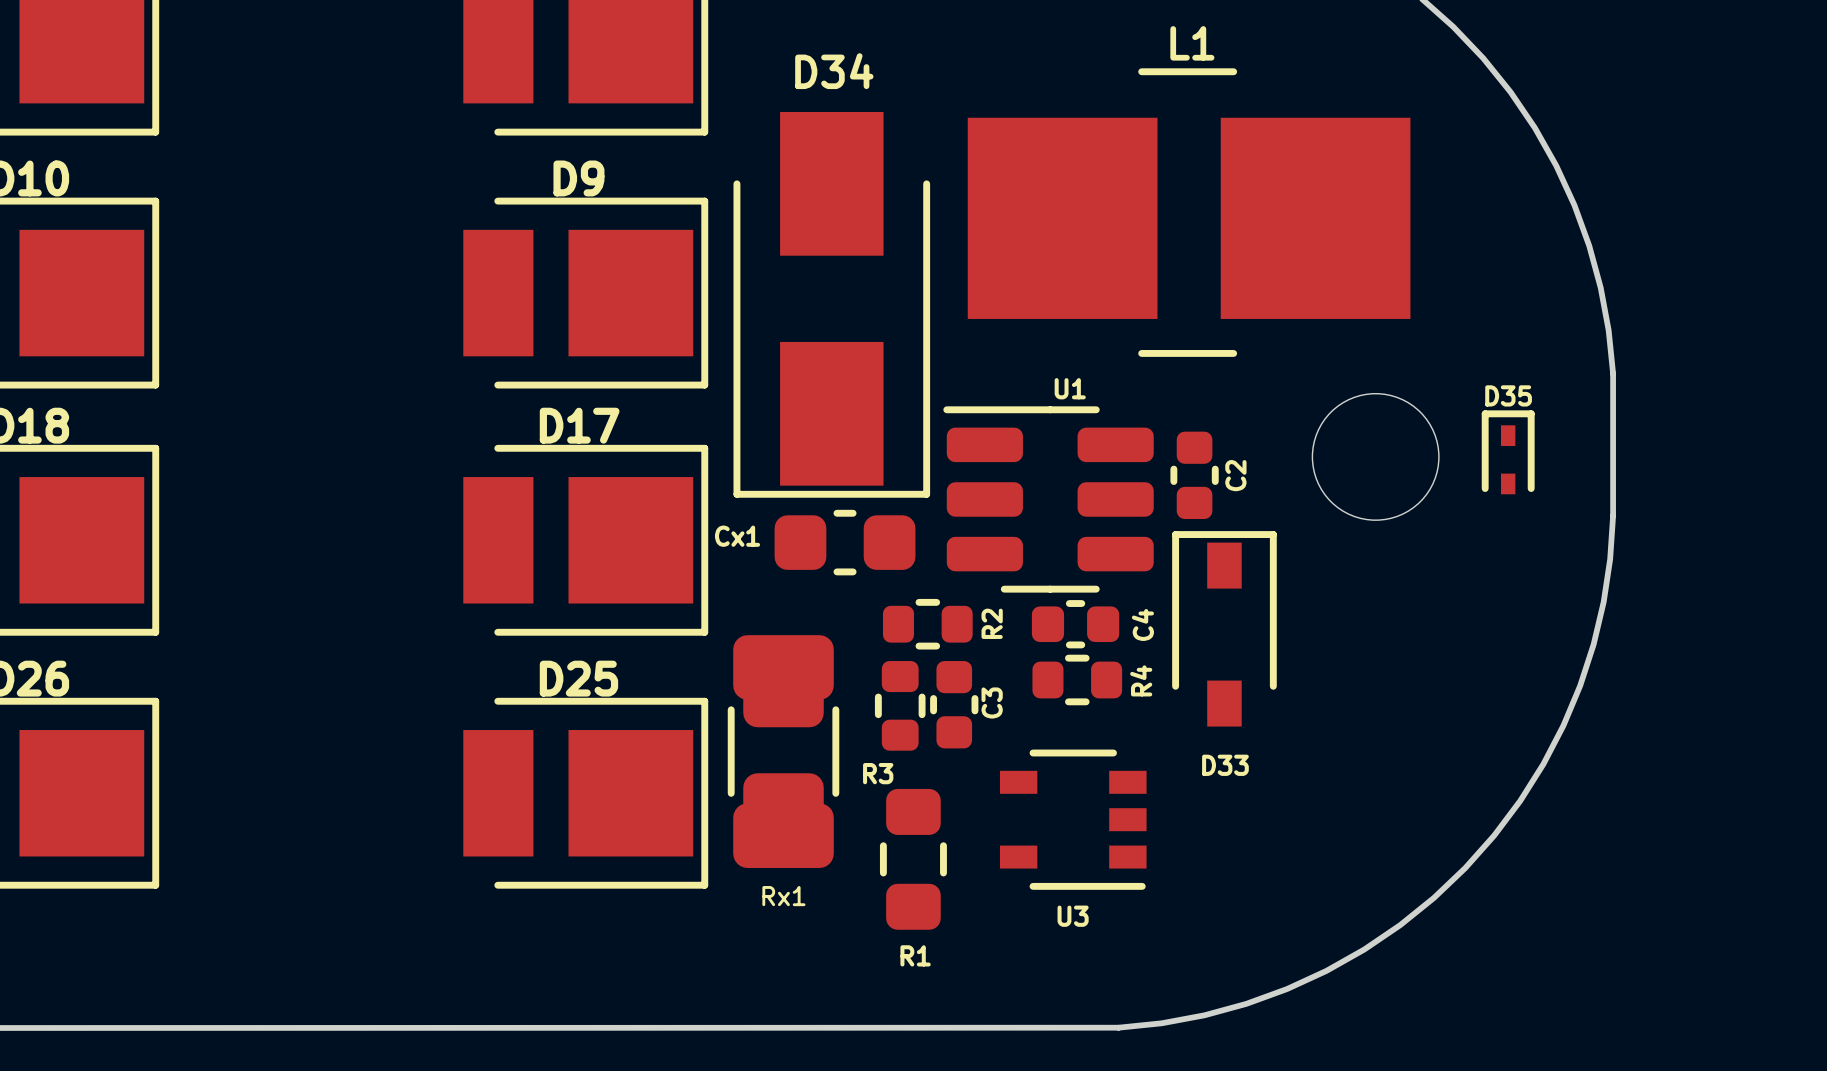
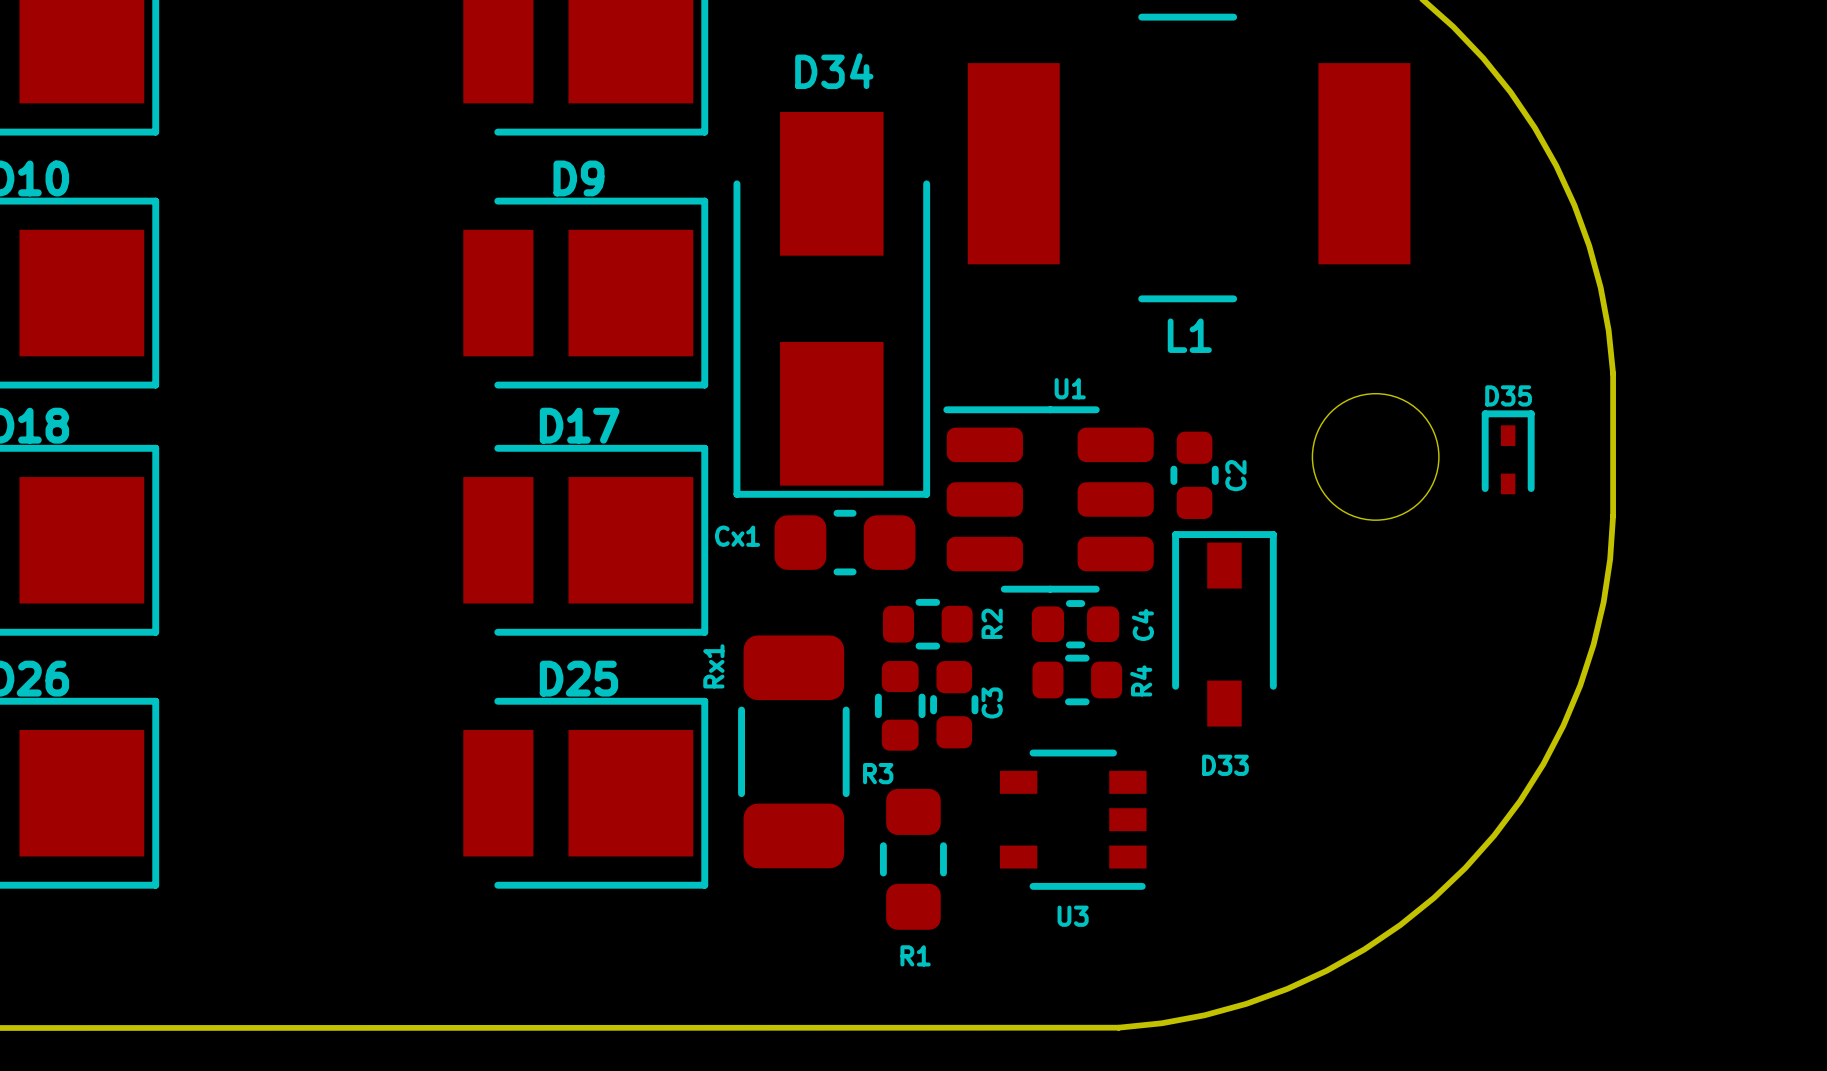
L1 name position: L1 (1192, 43) -> L1 (1189, 335)
L1 footprint: [967, 68, 1411, 357] -> [967, 13, 1411, 303]
Rx1 footprint: [727, 635, 840, 868] -> [738, 635, 850, 869]
Rx1 name rotation: 0° (783, 896) -> 90° counterclockwise (713, 666)
Rx1 name position: Rx1 (783, 896) -> Rx1 (713, 666)

